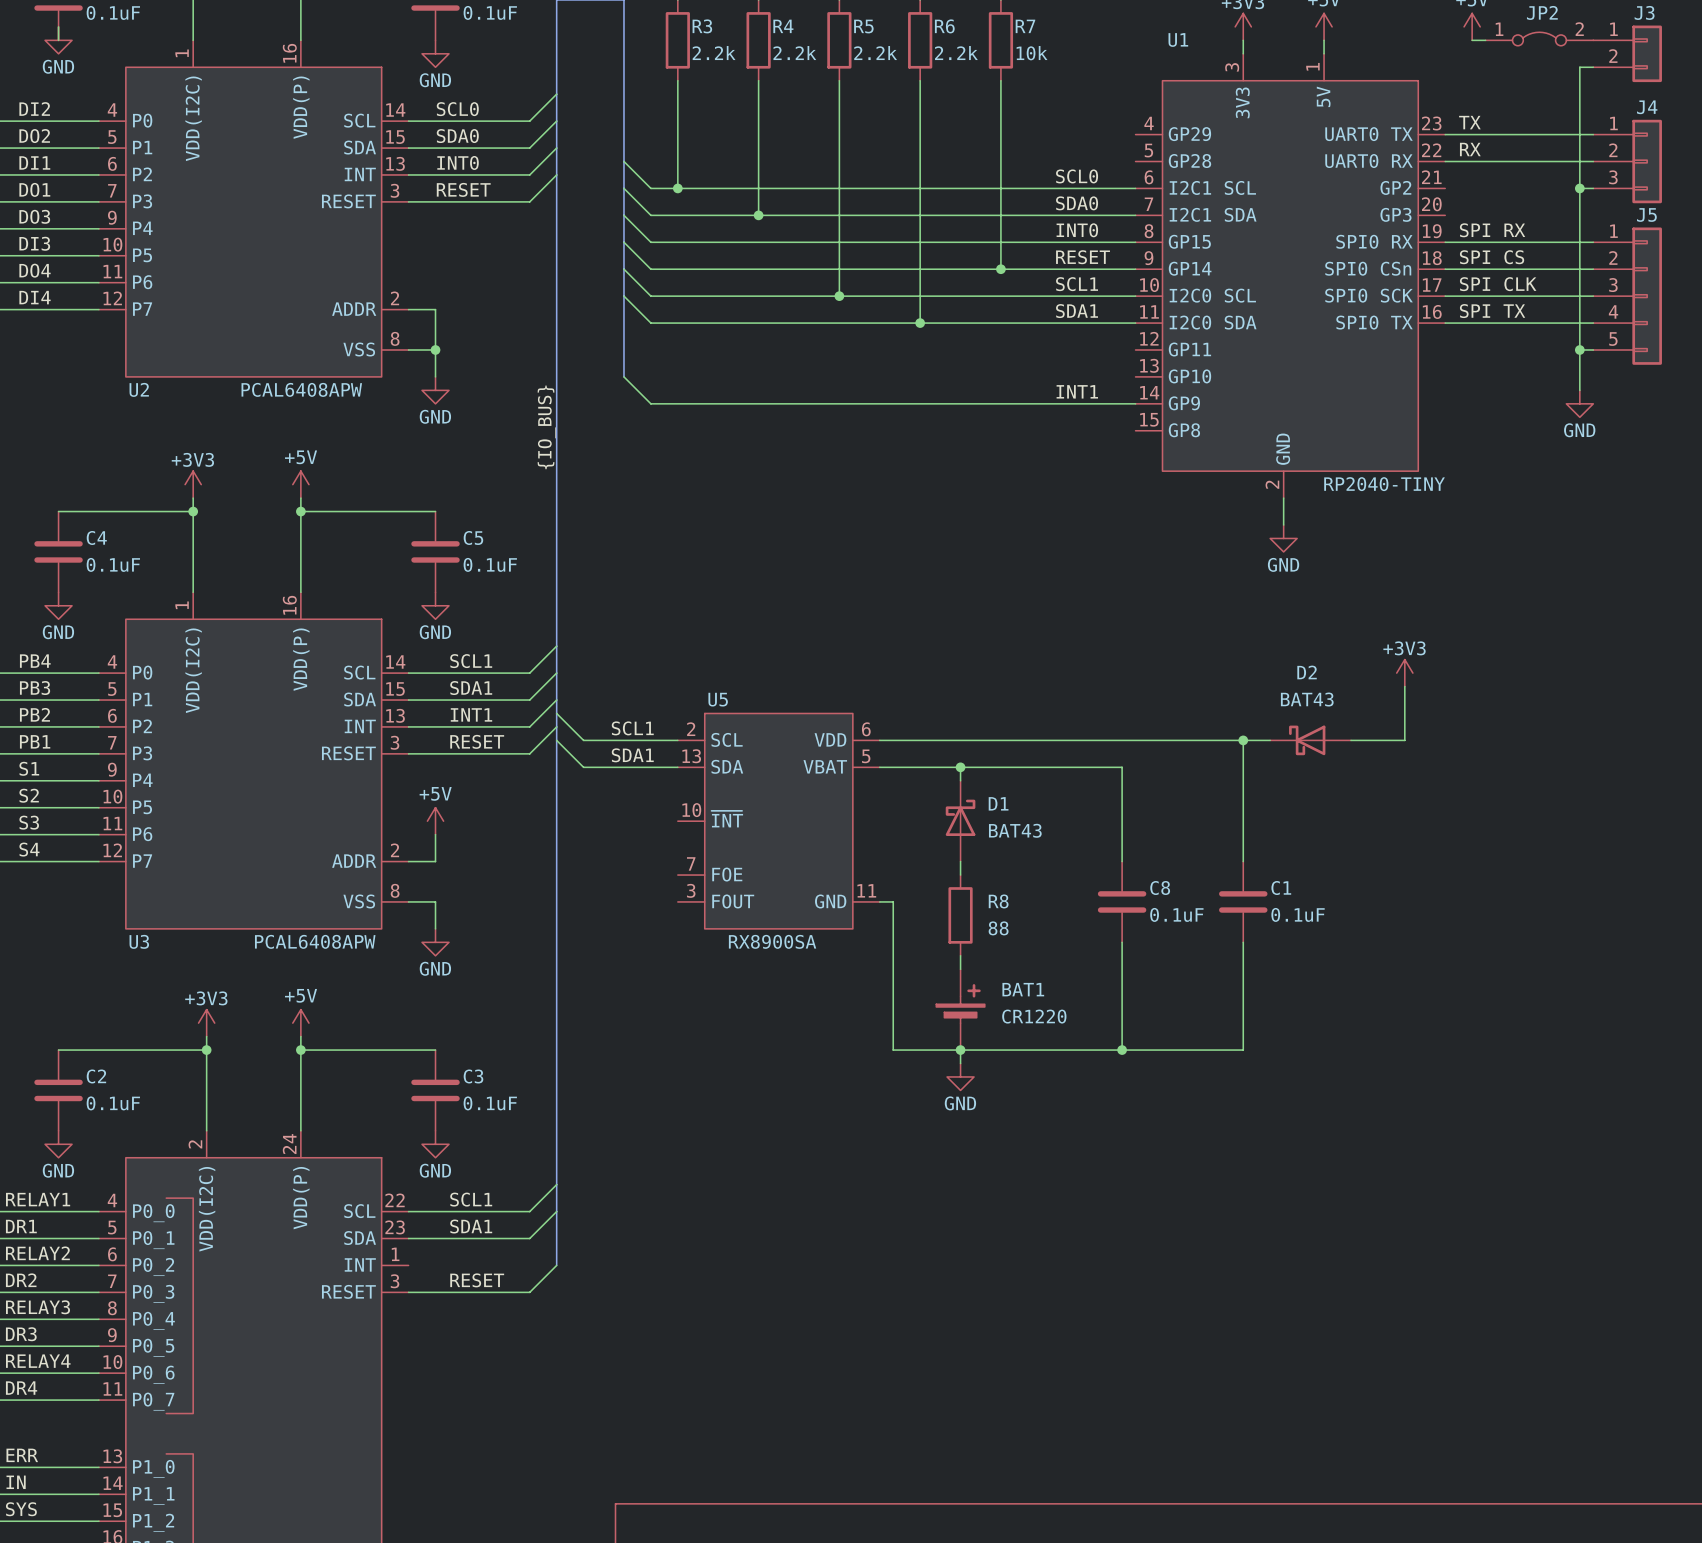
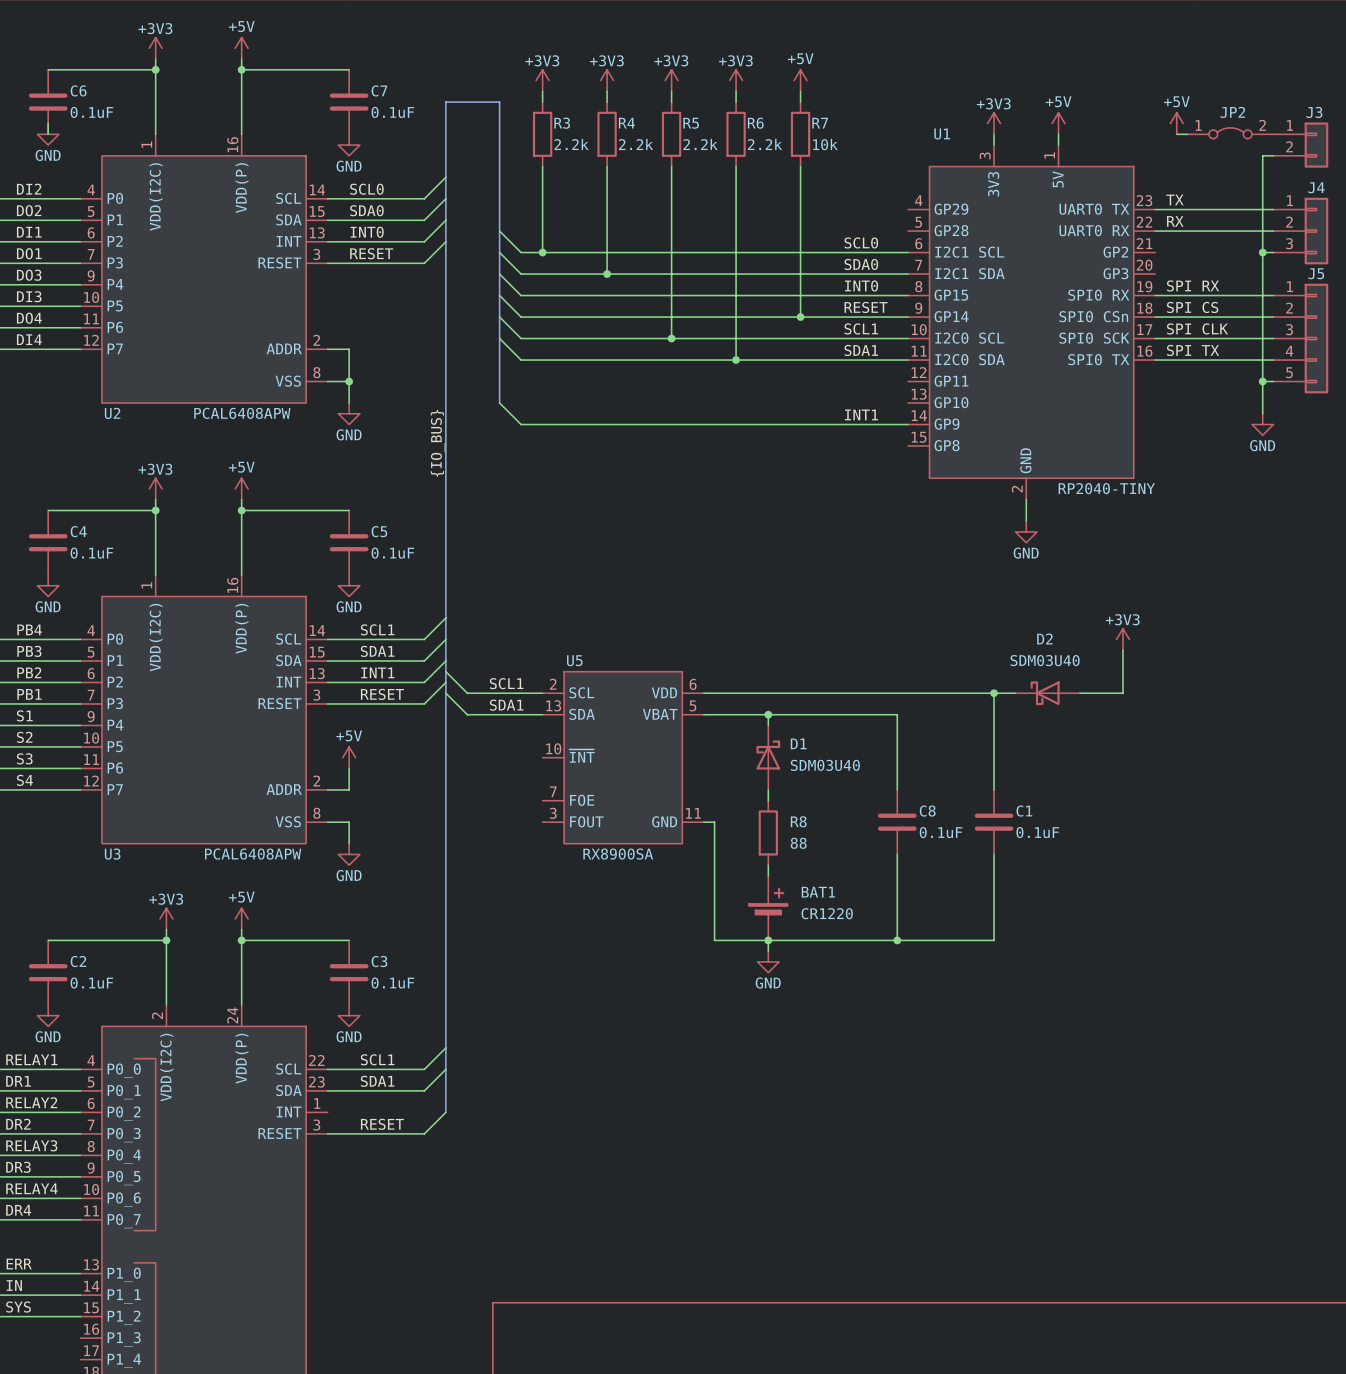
D2 value: BAT43 (1307, 699) -> SDM03U40 (1045, 660)
D1 value: BAT43 (1015, 830) -> SDM03U40 (825, 765)

